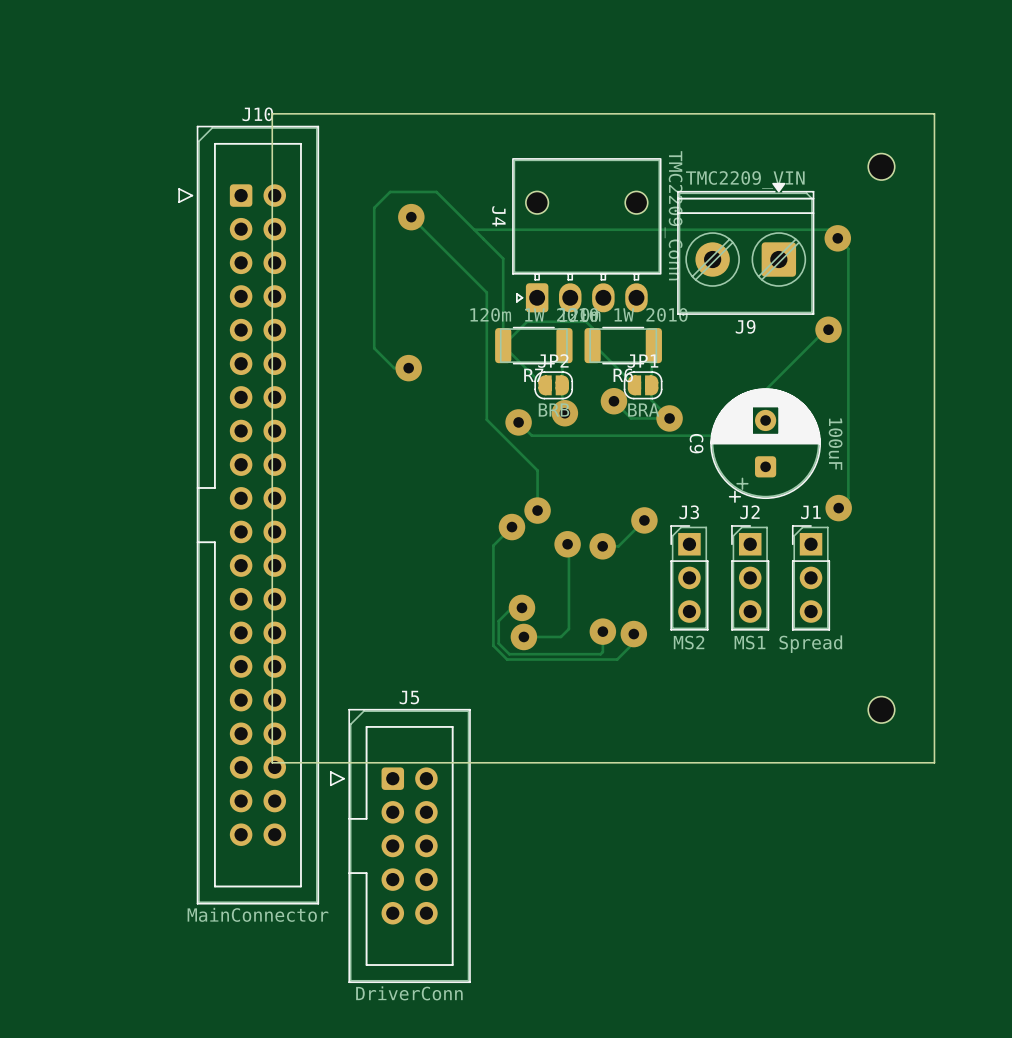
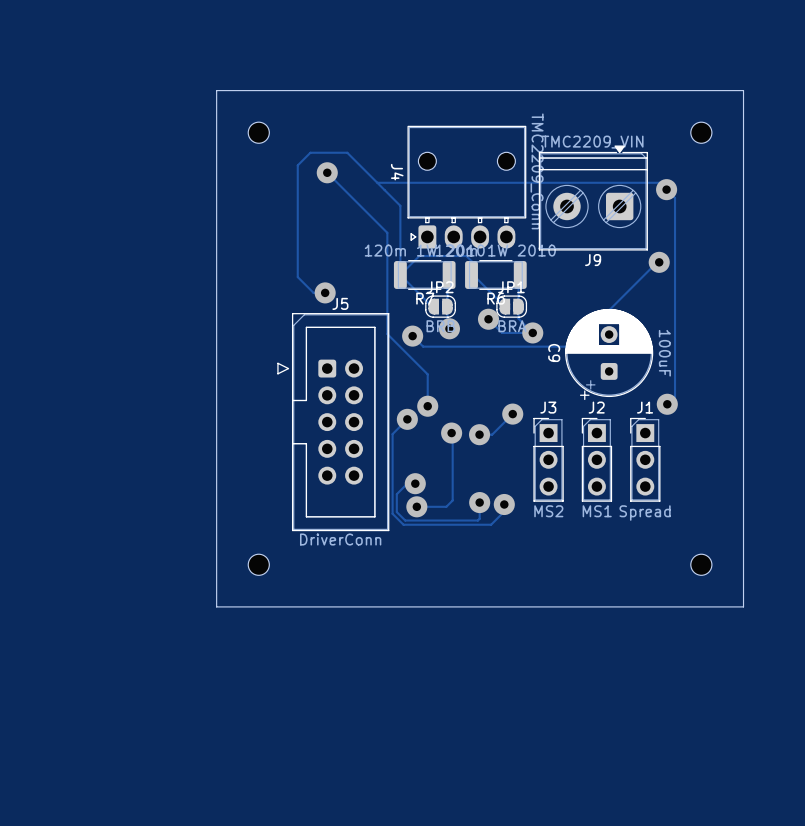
part: none -> (258, 132)
J10: MainConnector (248, 515) -> none
part: none -> (258, 564)
J5 position: (400, 845) -> (333, 422)

